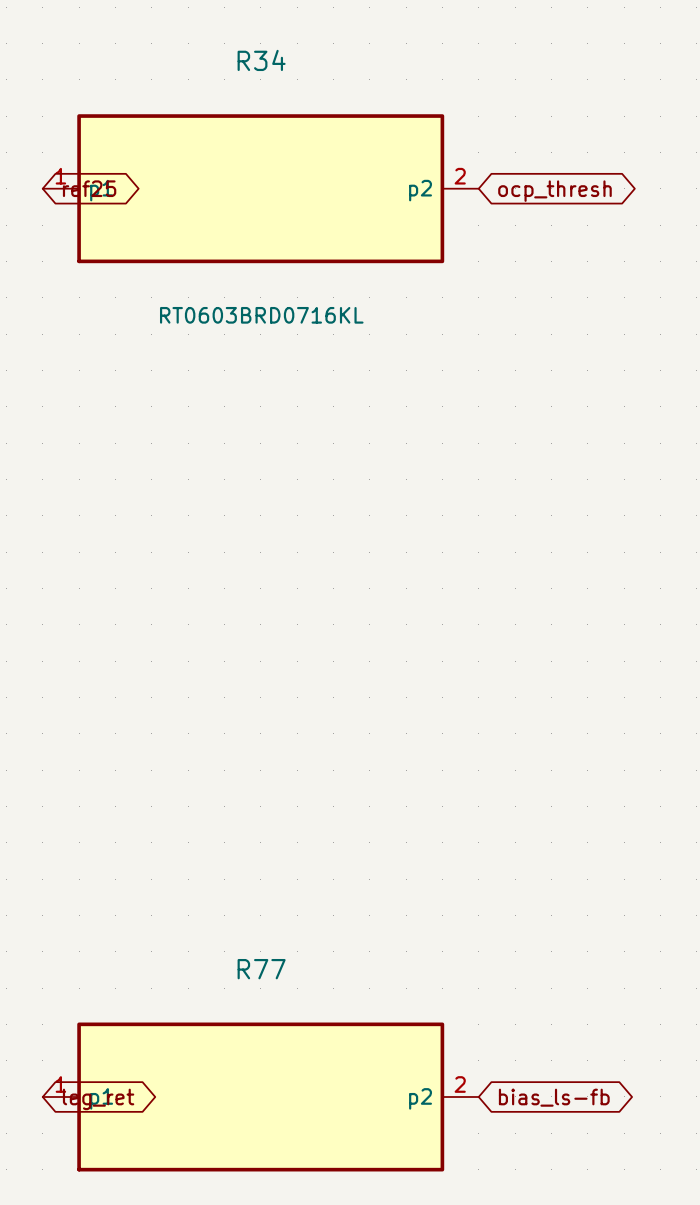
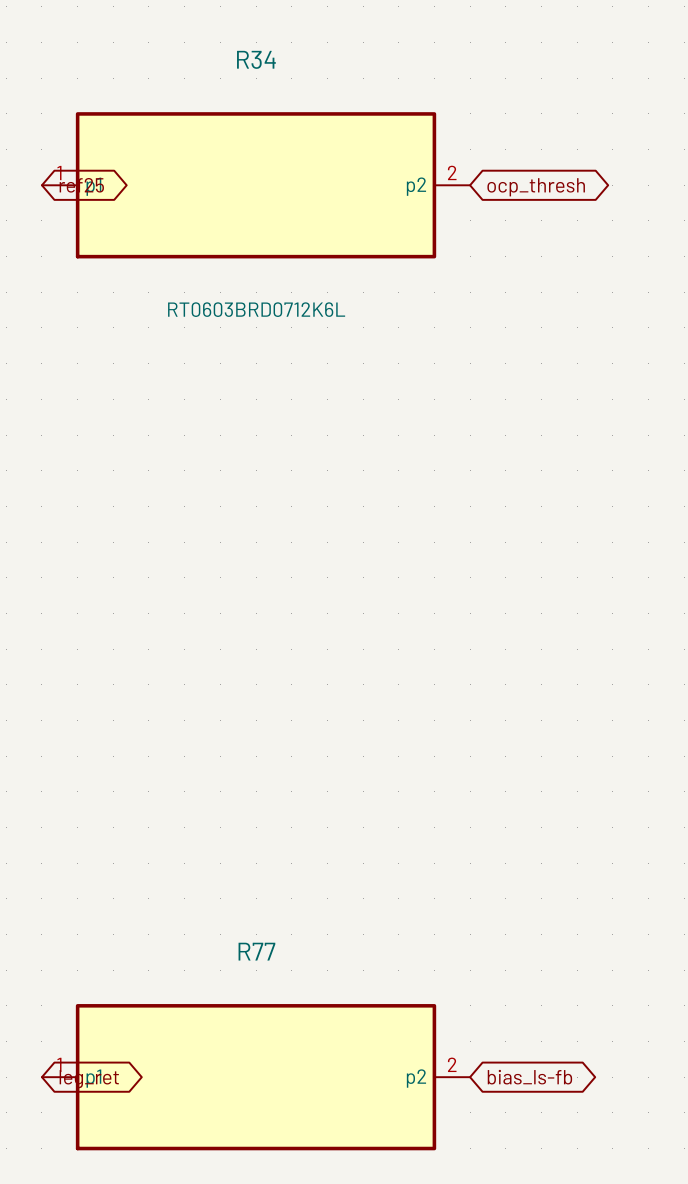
R34 value: RT0603BRD0716KL (261, 315) -> RT0603BRD0712K6L (256, 309)

